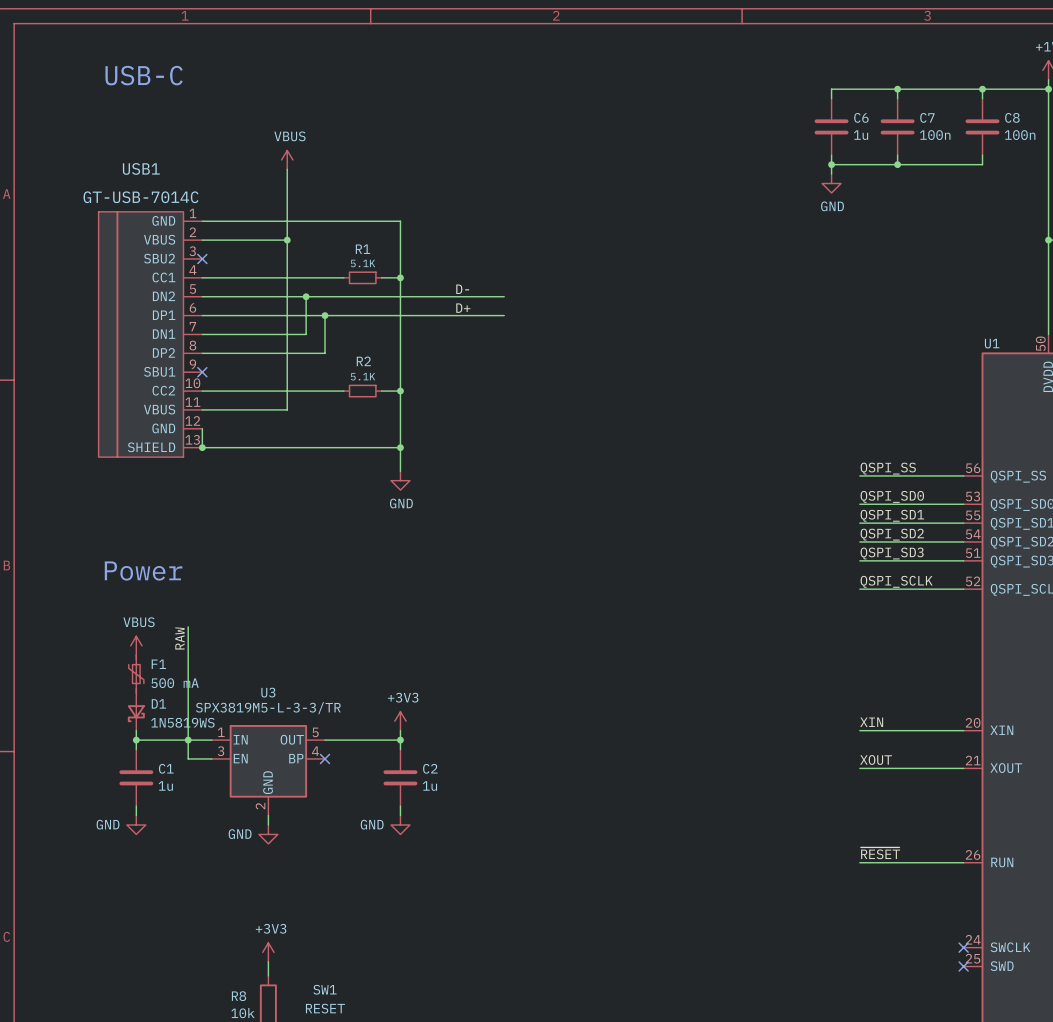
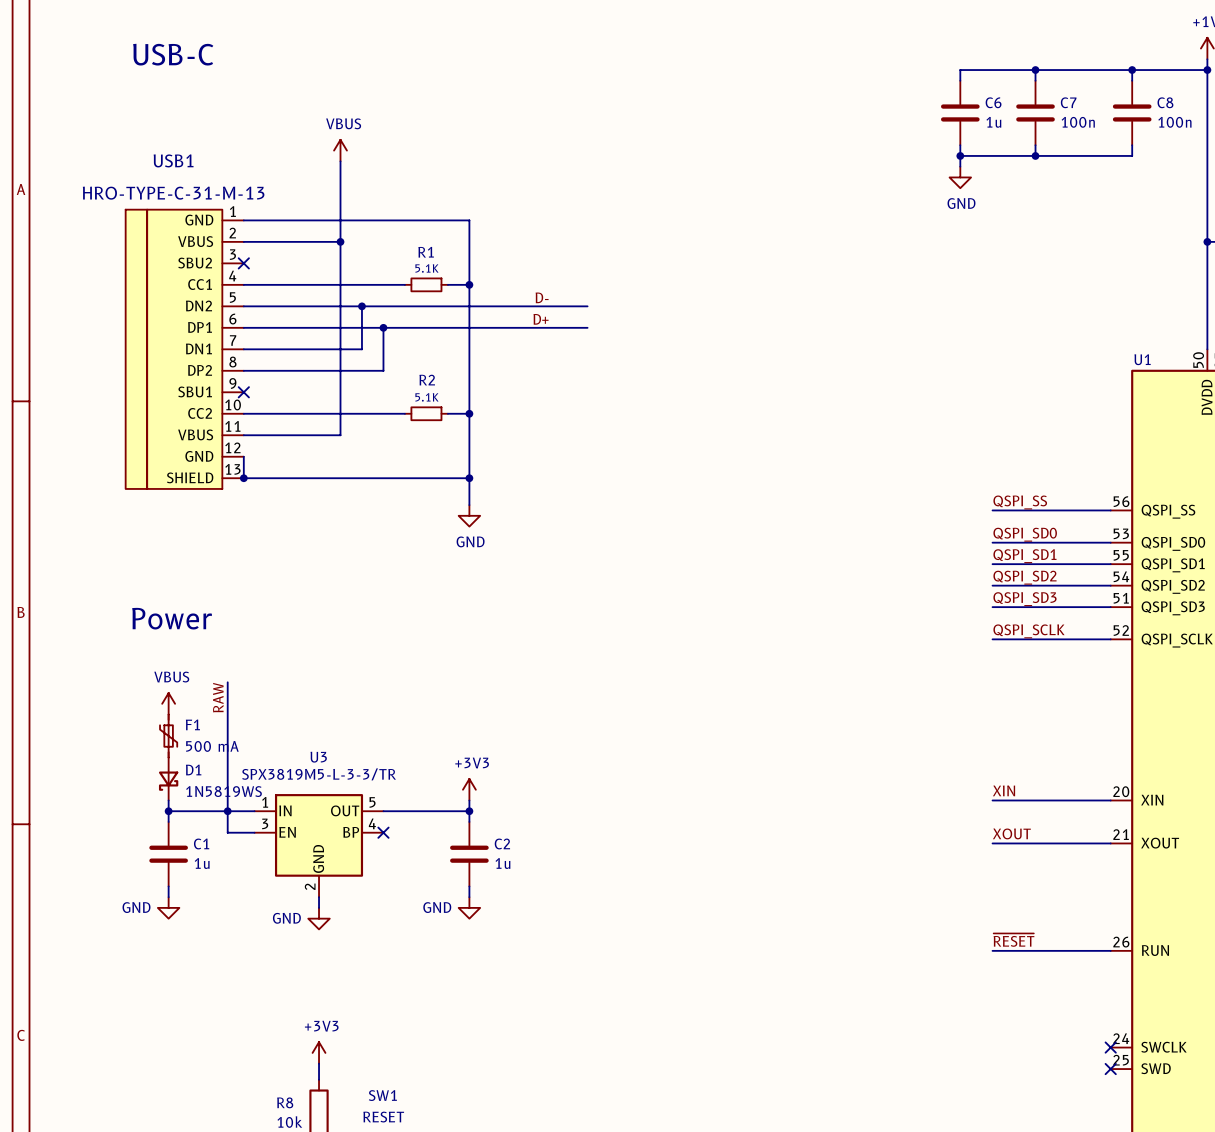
USB1 value: GT-USB-7014C (140, 197) -> HRO-TYPE-C-31-M-13 (173, 193)

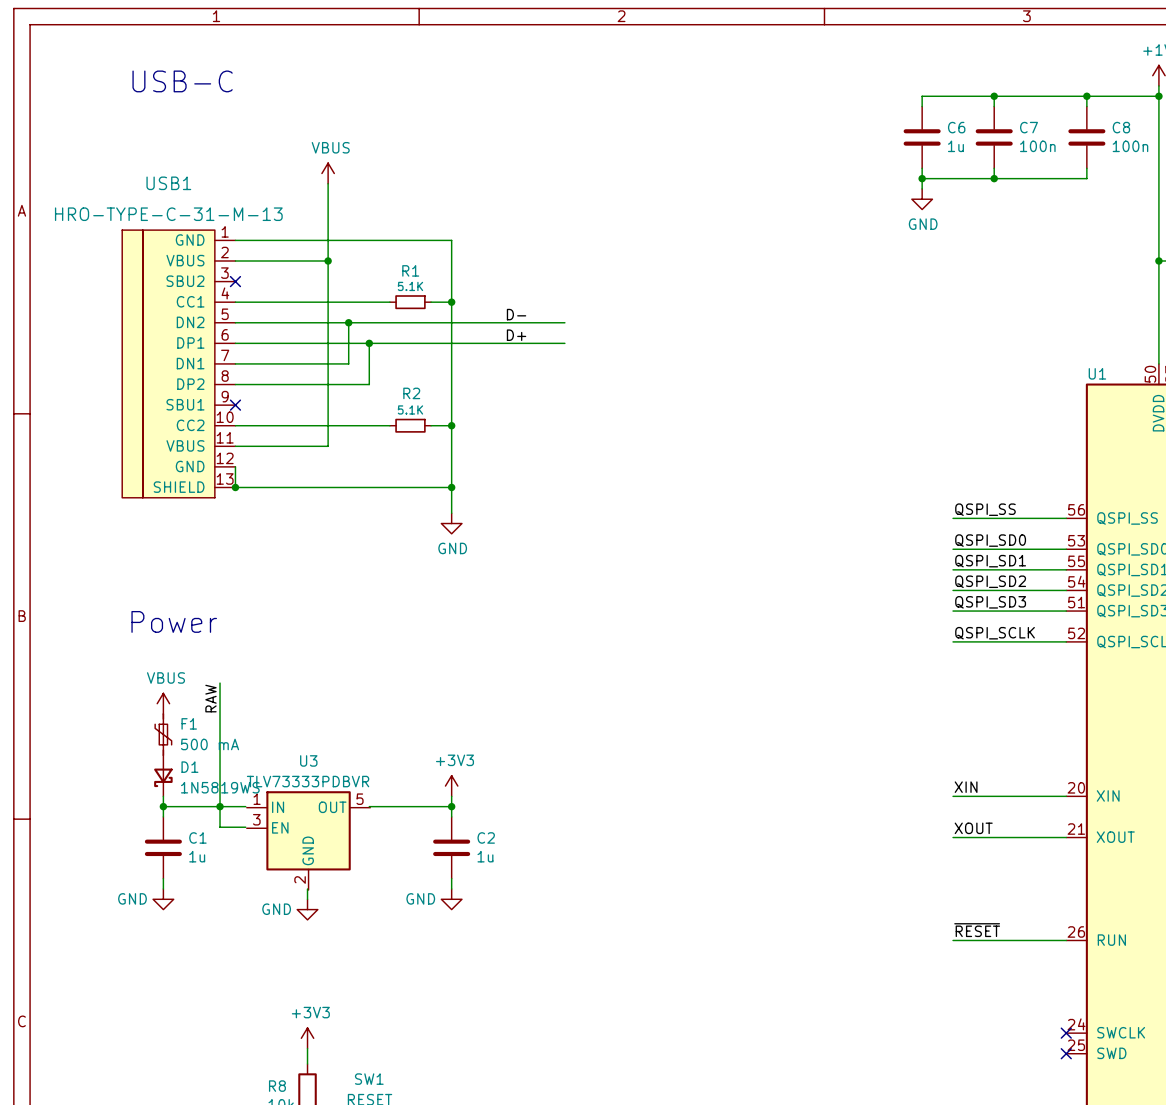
U3 value: SPX3819M5-L-3-3/TR (319, 774) -> TLV73333PDBVR (308, 781)
U3 symbol: [254, 794, 384, 898] -> [246, 791, 371, 891]
no-connect mark: (383, 832) -> none

